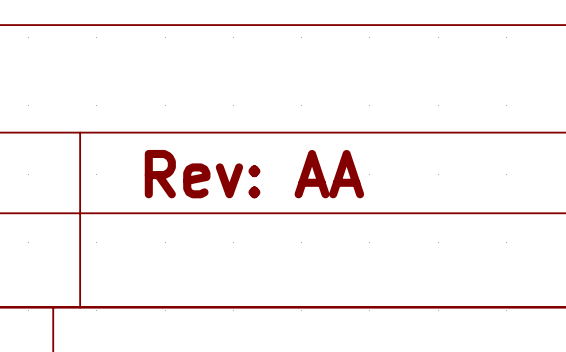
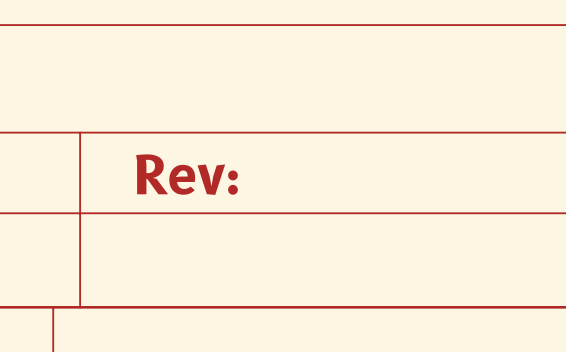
title block: Rev: AA (254, 174) -> Rev: (186, 174)

